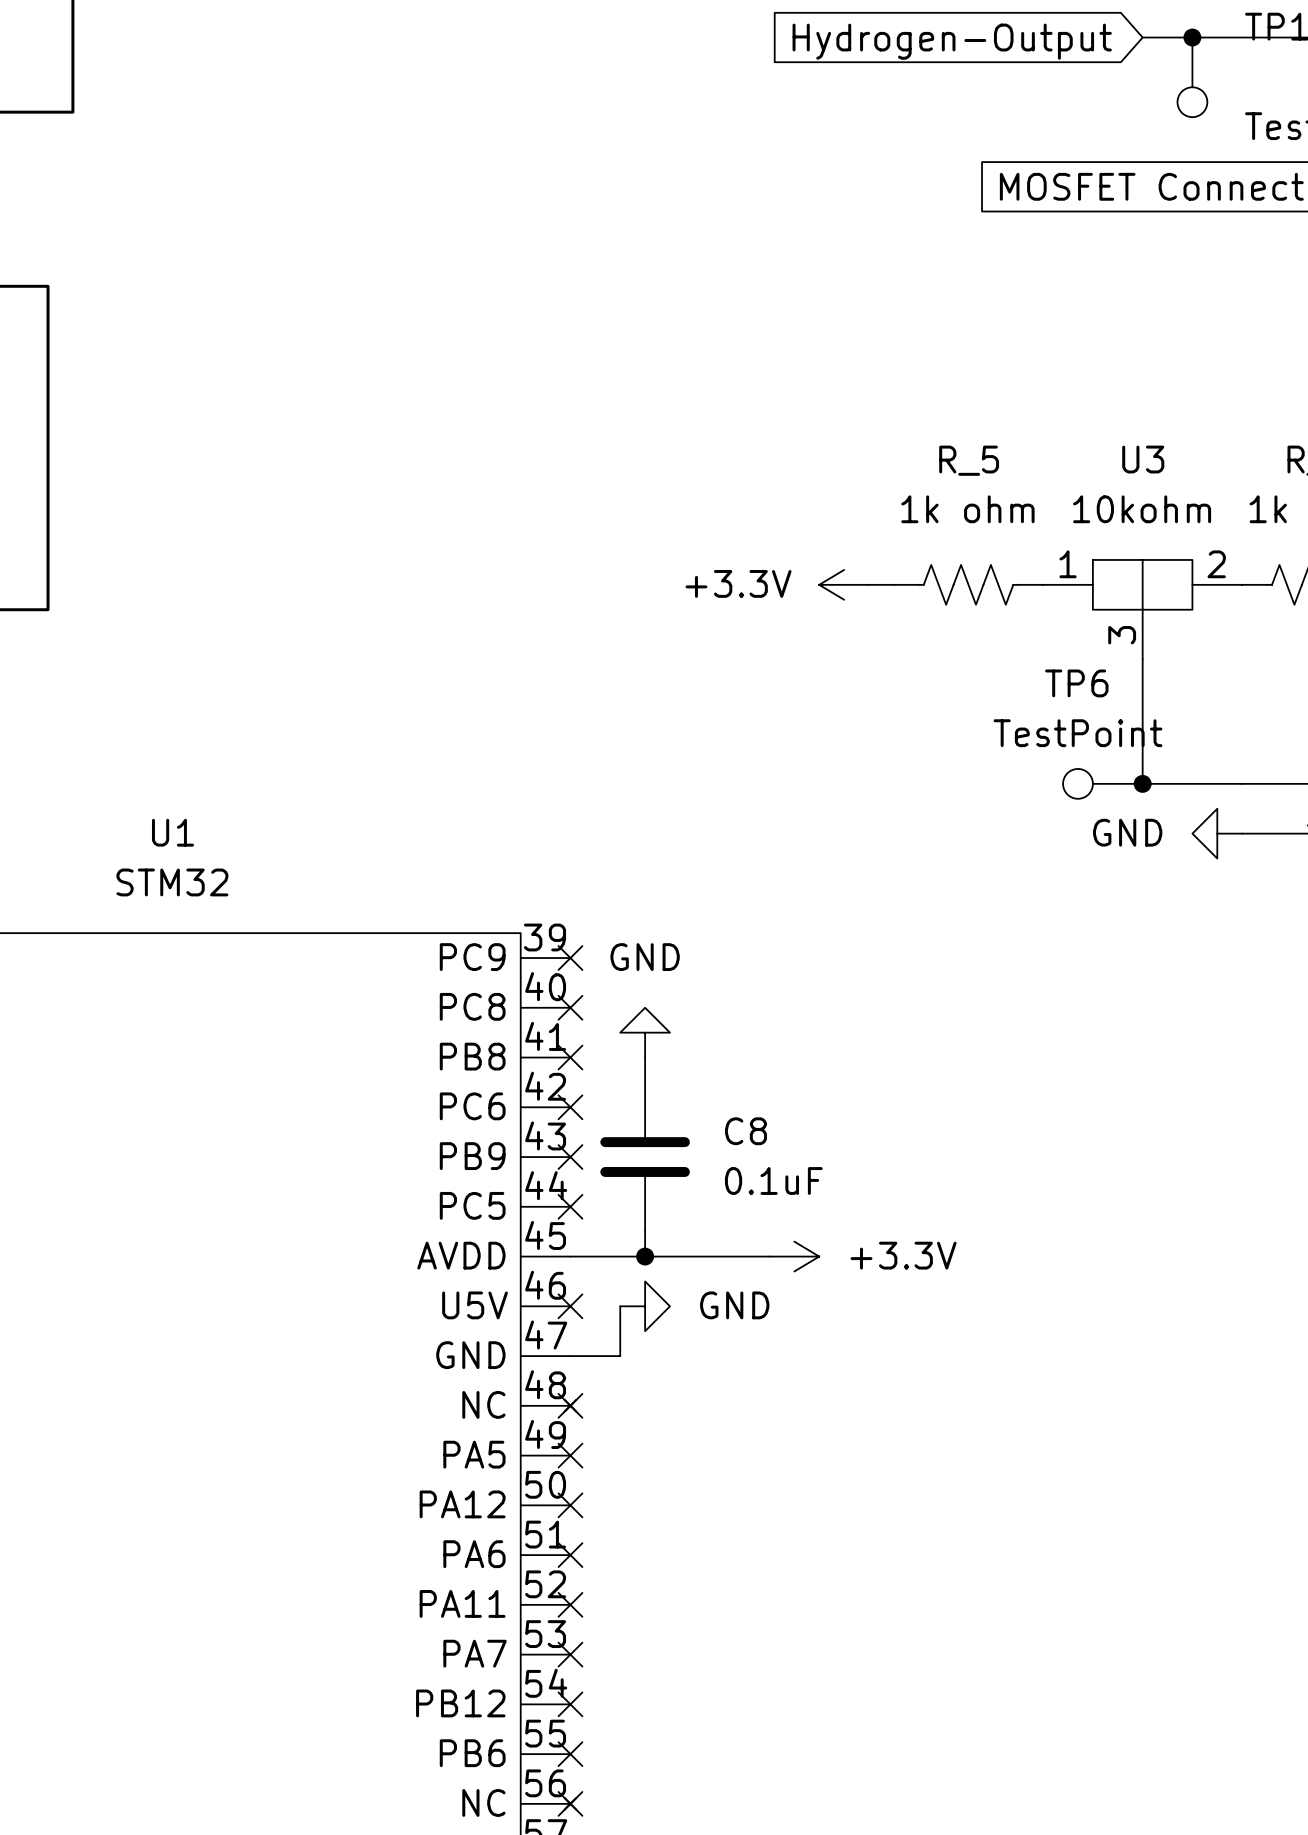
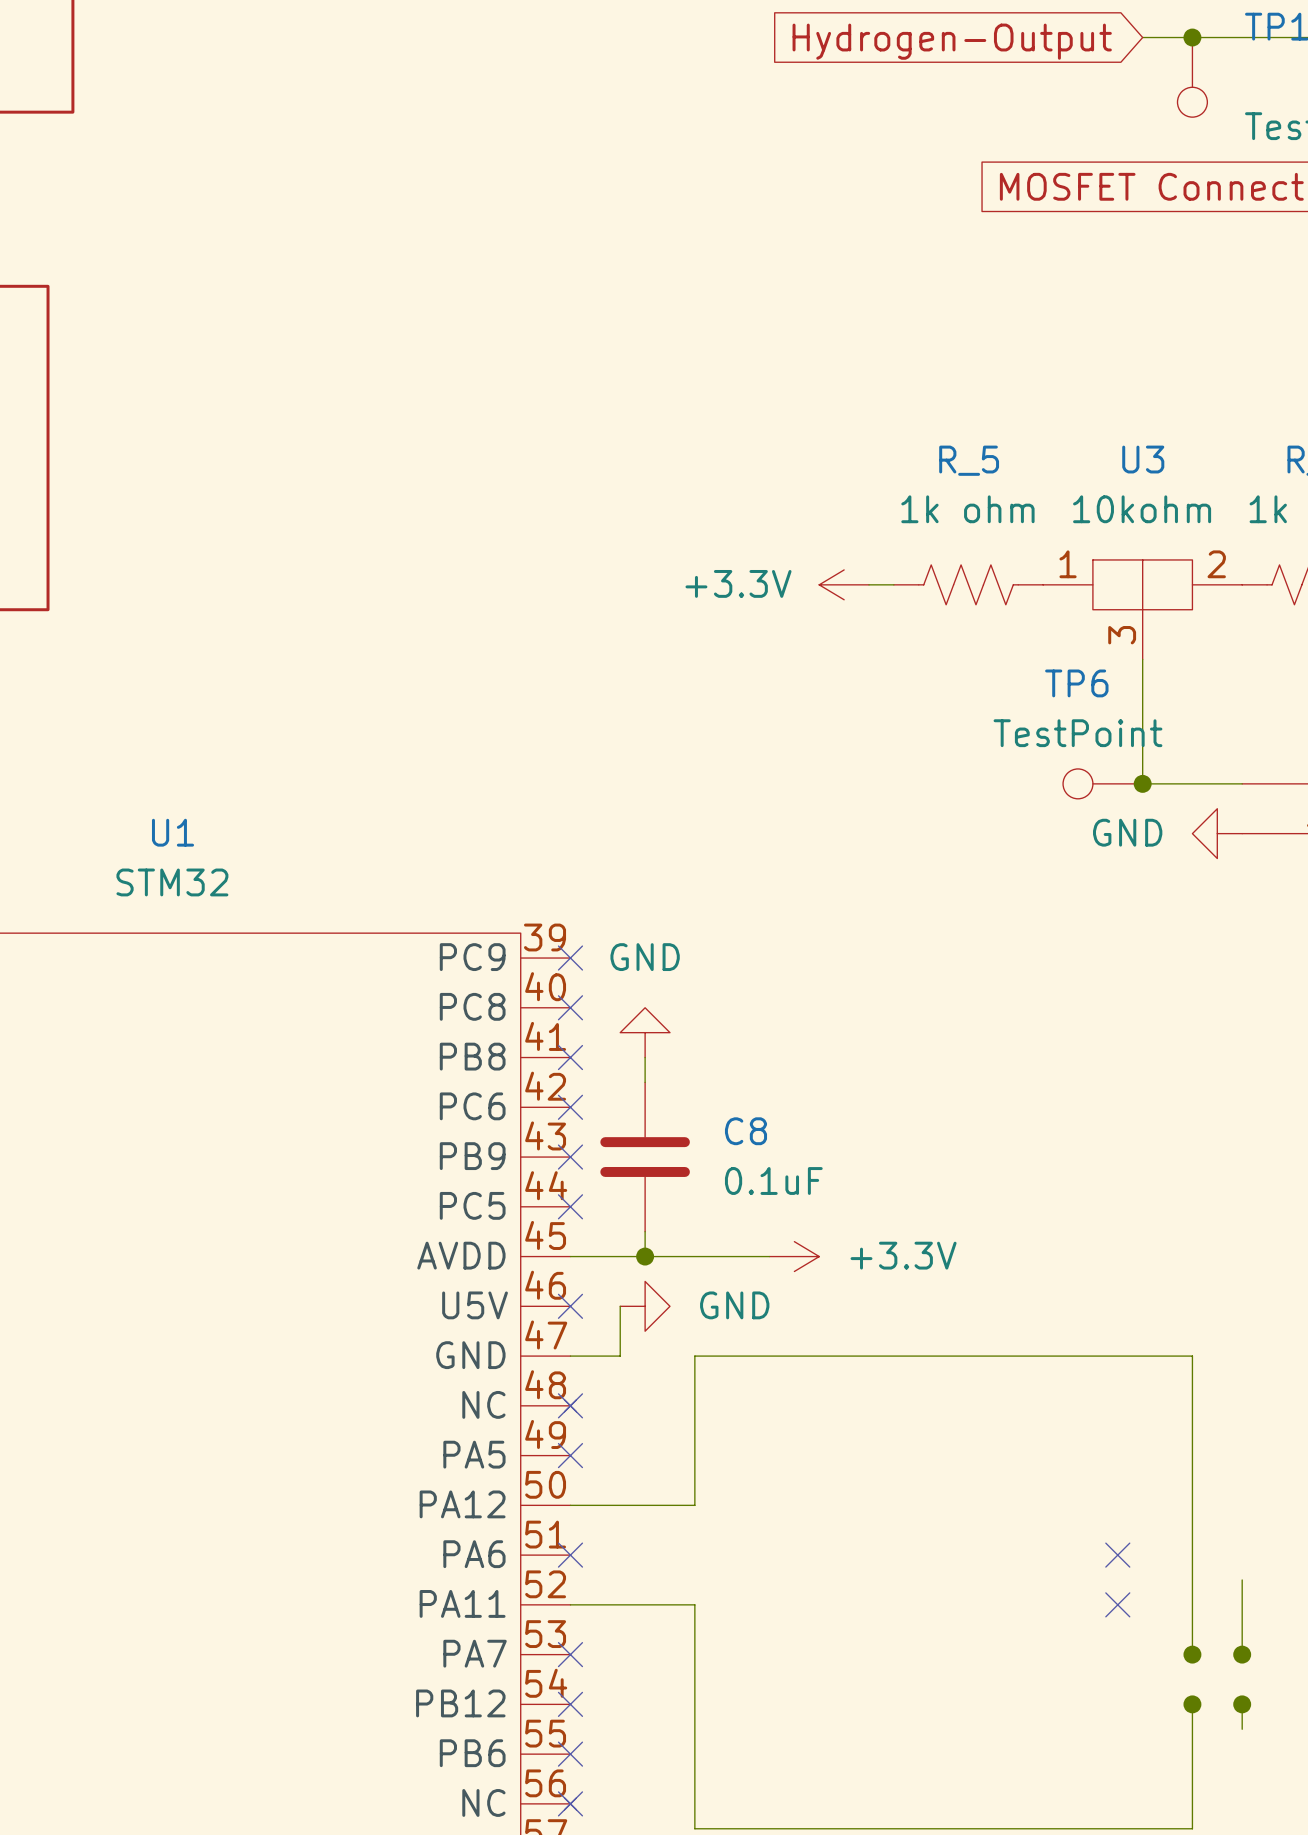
wire: none -> (570, 1505) (694, 1505) (694, 1356) (1192, 1356) (1192, 1654)
no-connect mark: (570, 1505) -> none
no-connect mark: none -> (1117, 1555)
wire: none -> (1242, 1579) (1242, 1654)
wire: none -> (570, 1604) (694, 1604) (694, 1828) (1192, 1828) (1192, 1704)
no-connect mark: (570, 1604) -> none
no-connect mark: none -> (1117, 1604)
junction: none -> (1192, 1654)
junction: none -> (1242, 1654)
junction: none -> (1192, 1704)
wire: none -> (1242, 1704) (1242, 1729)
junction: none -> (1242, 1704)

